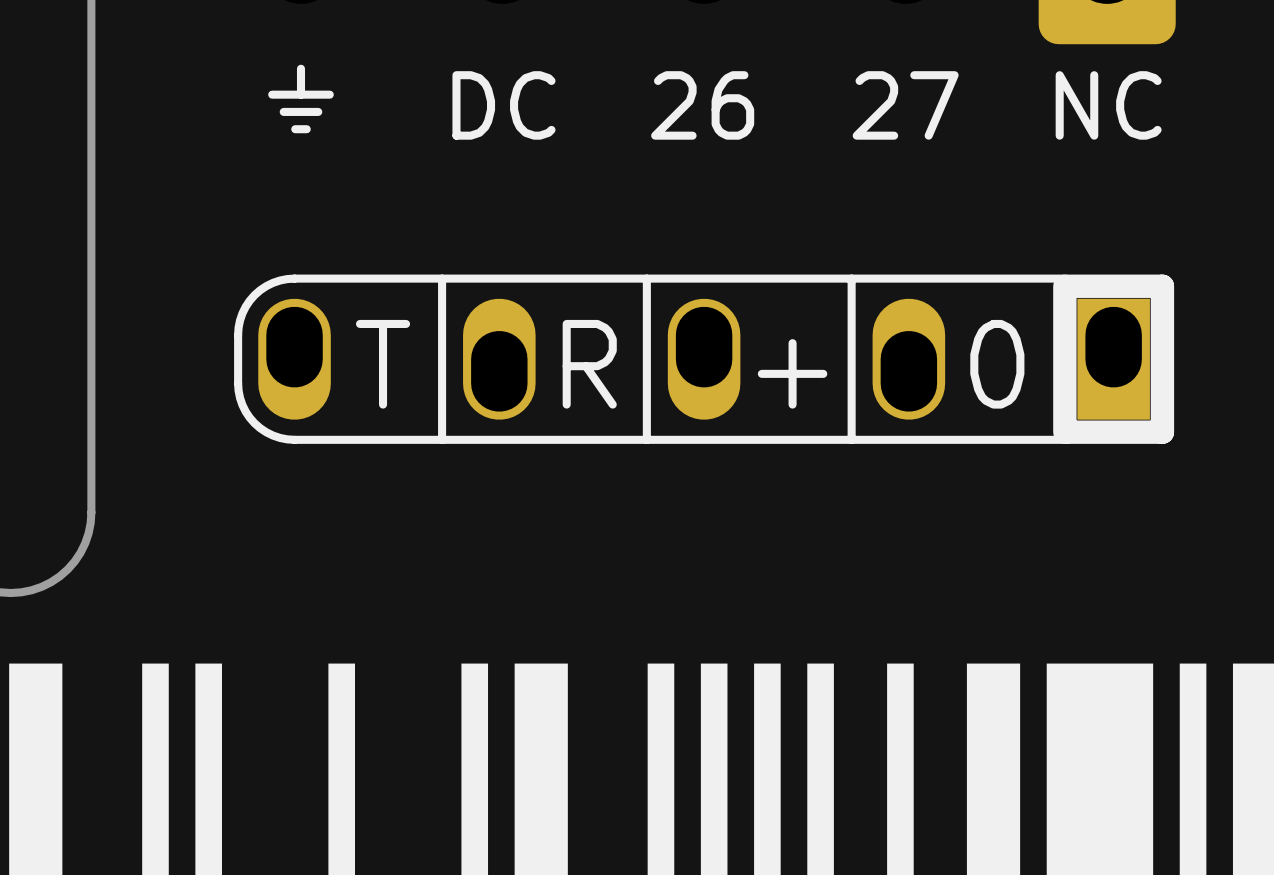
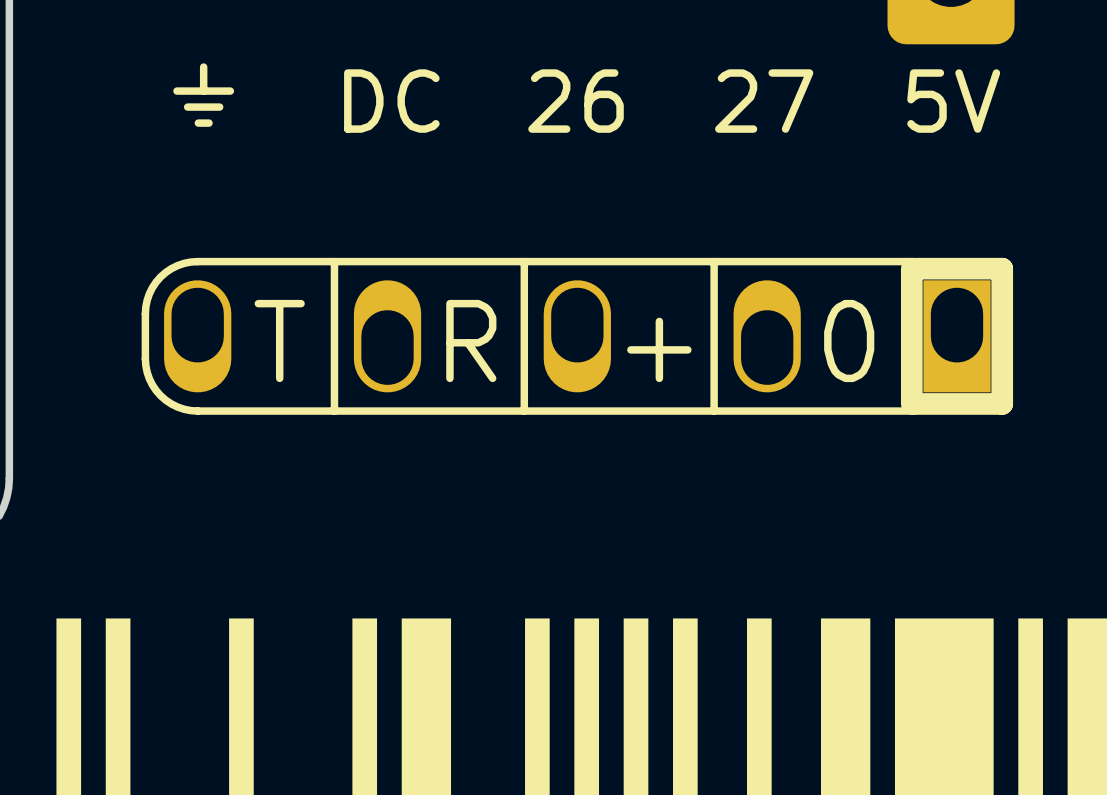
text: NC (1108, 105) -> 5V (953, 101)

